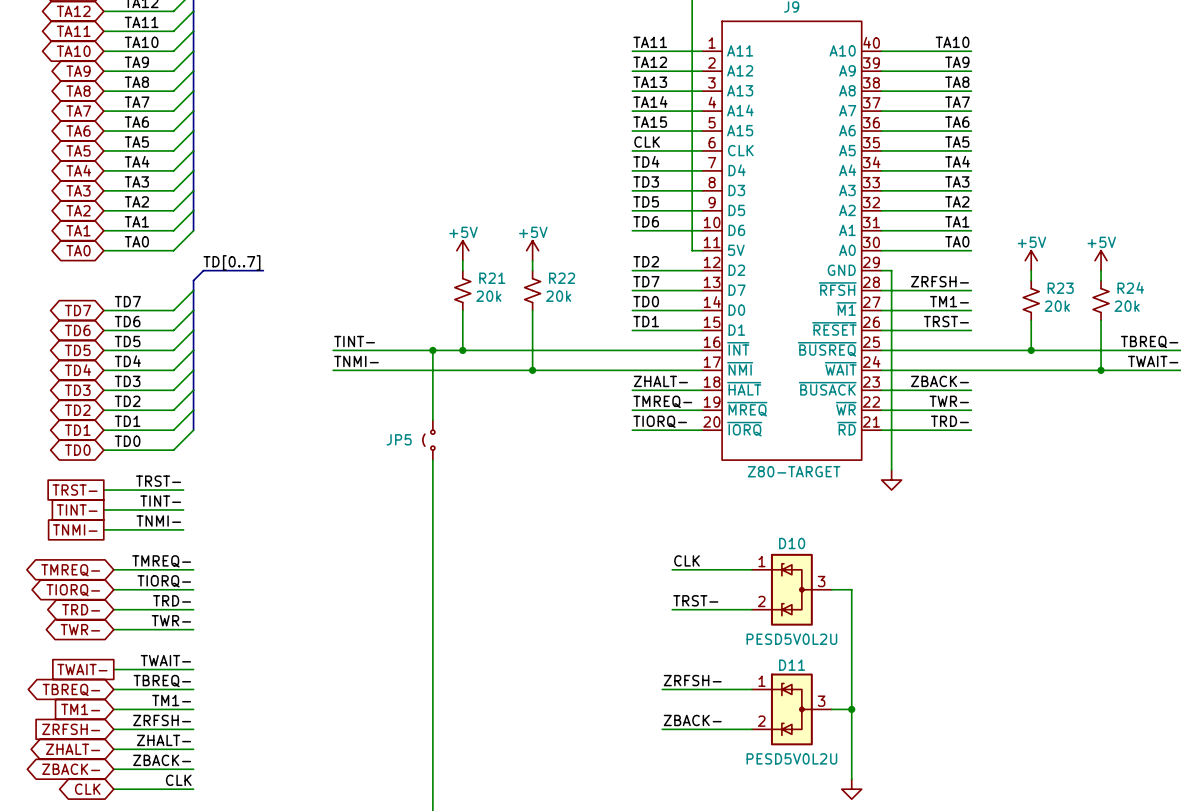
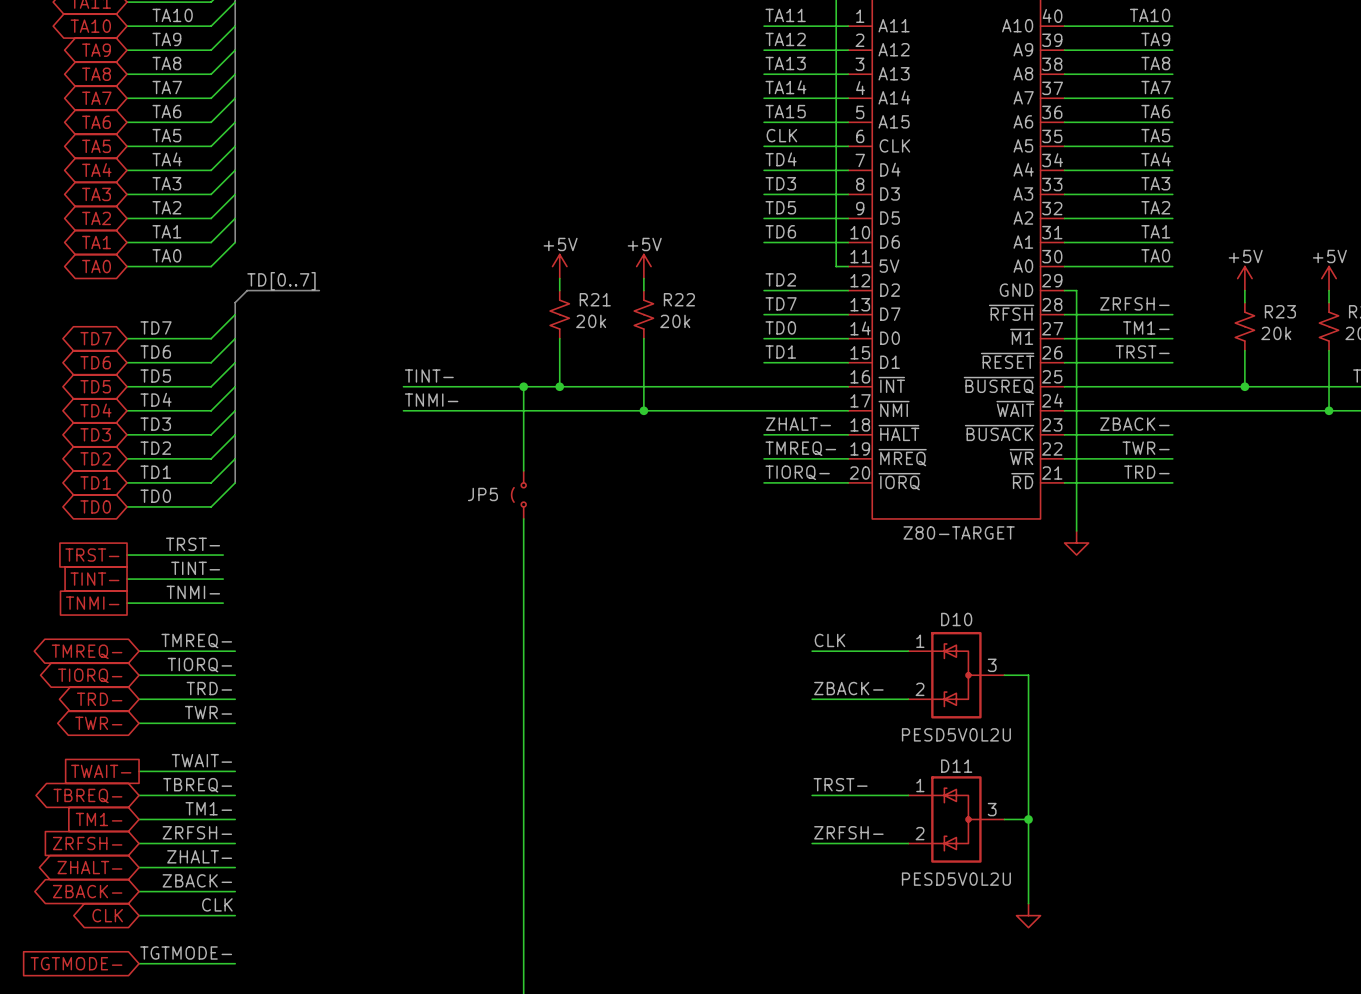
label: TRST- (695, 600) -> ZBACK- (848, 688)
label position: ZRFSH- (692, 680) -> ZRFSH- (848, 832)
label: none -> TRST- (840, 784)
wire: (662, 689) (672, 689) -> none
label: ZBACK- (692, 720) -> none
wire: (662, 729) (672, 729) -> none

